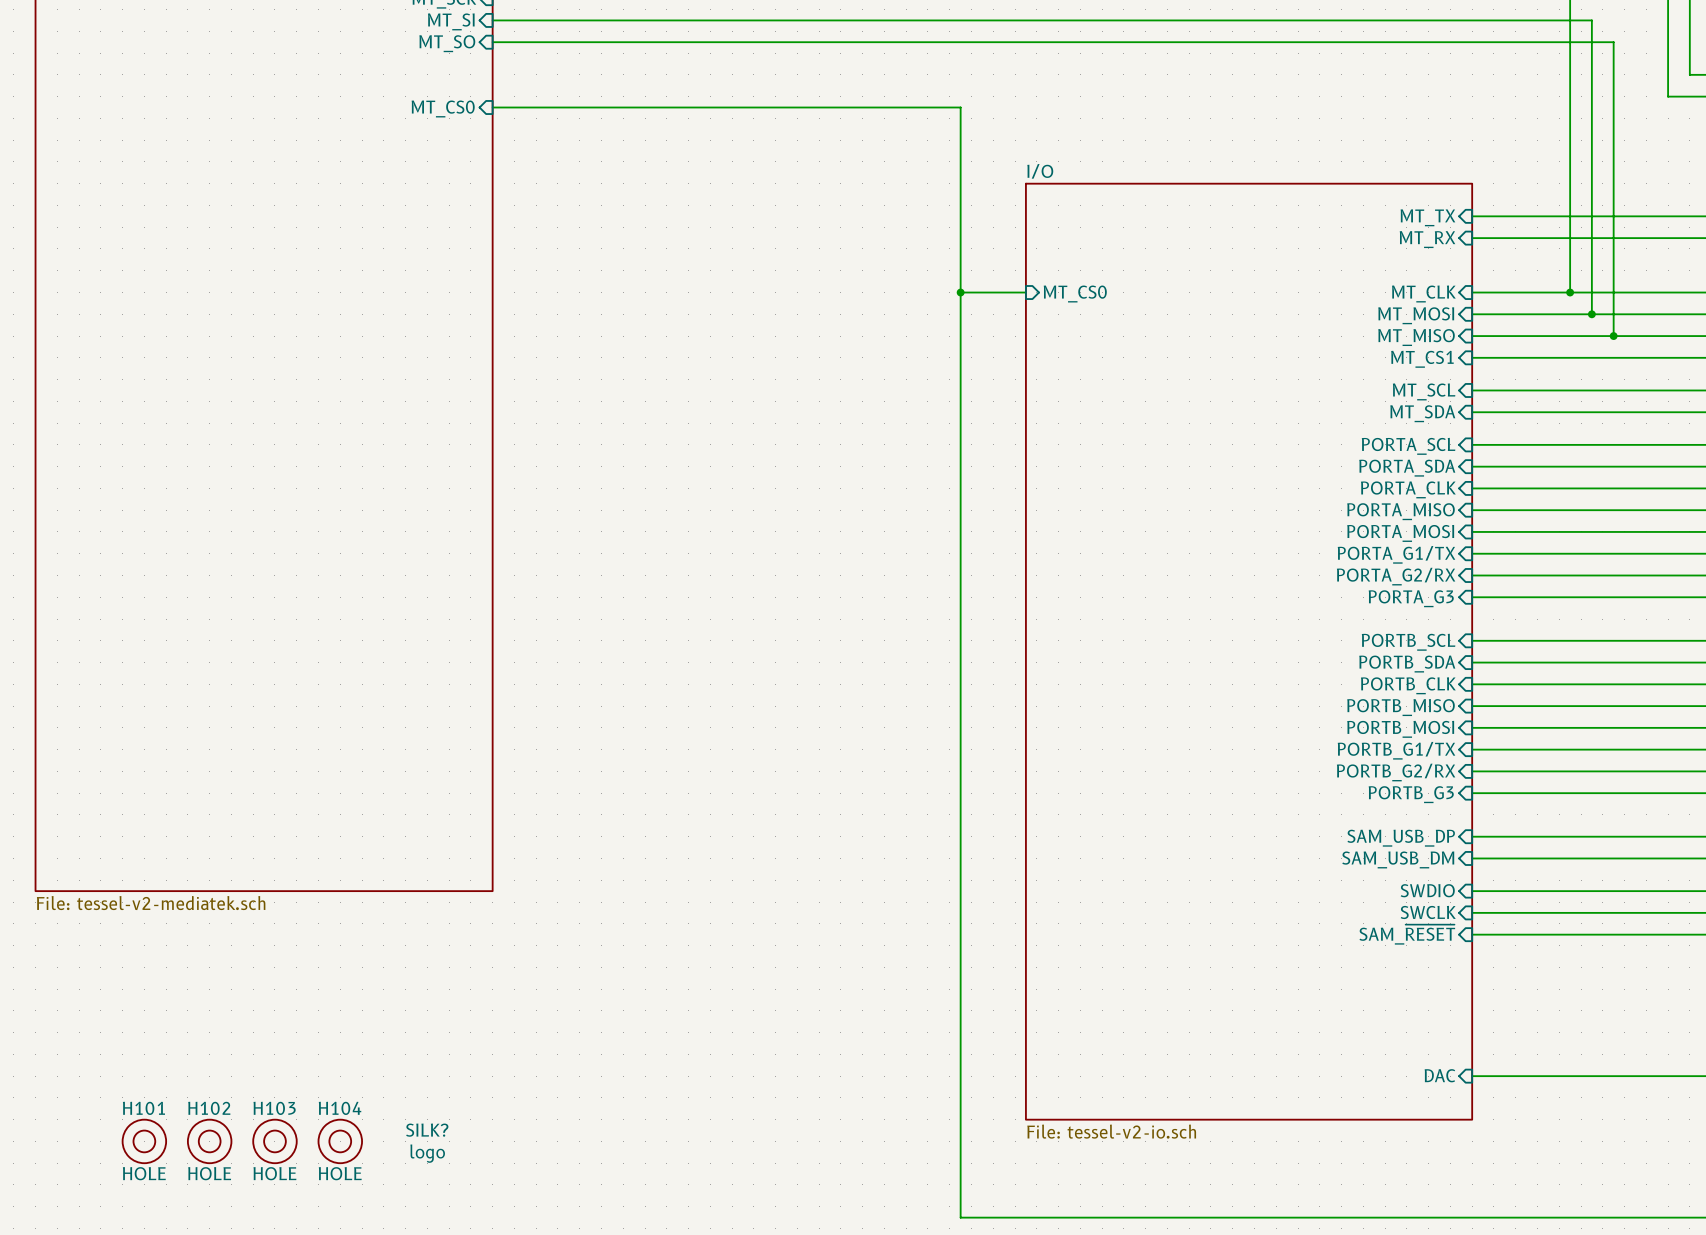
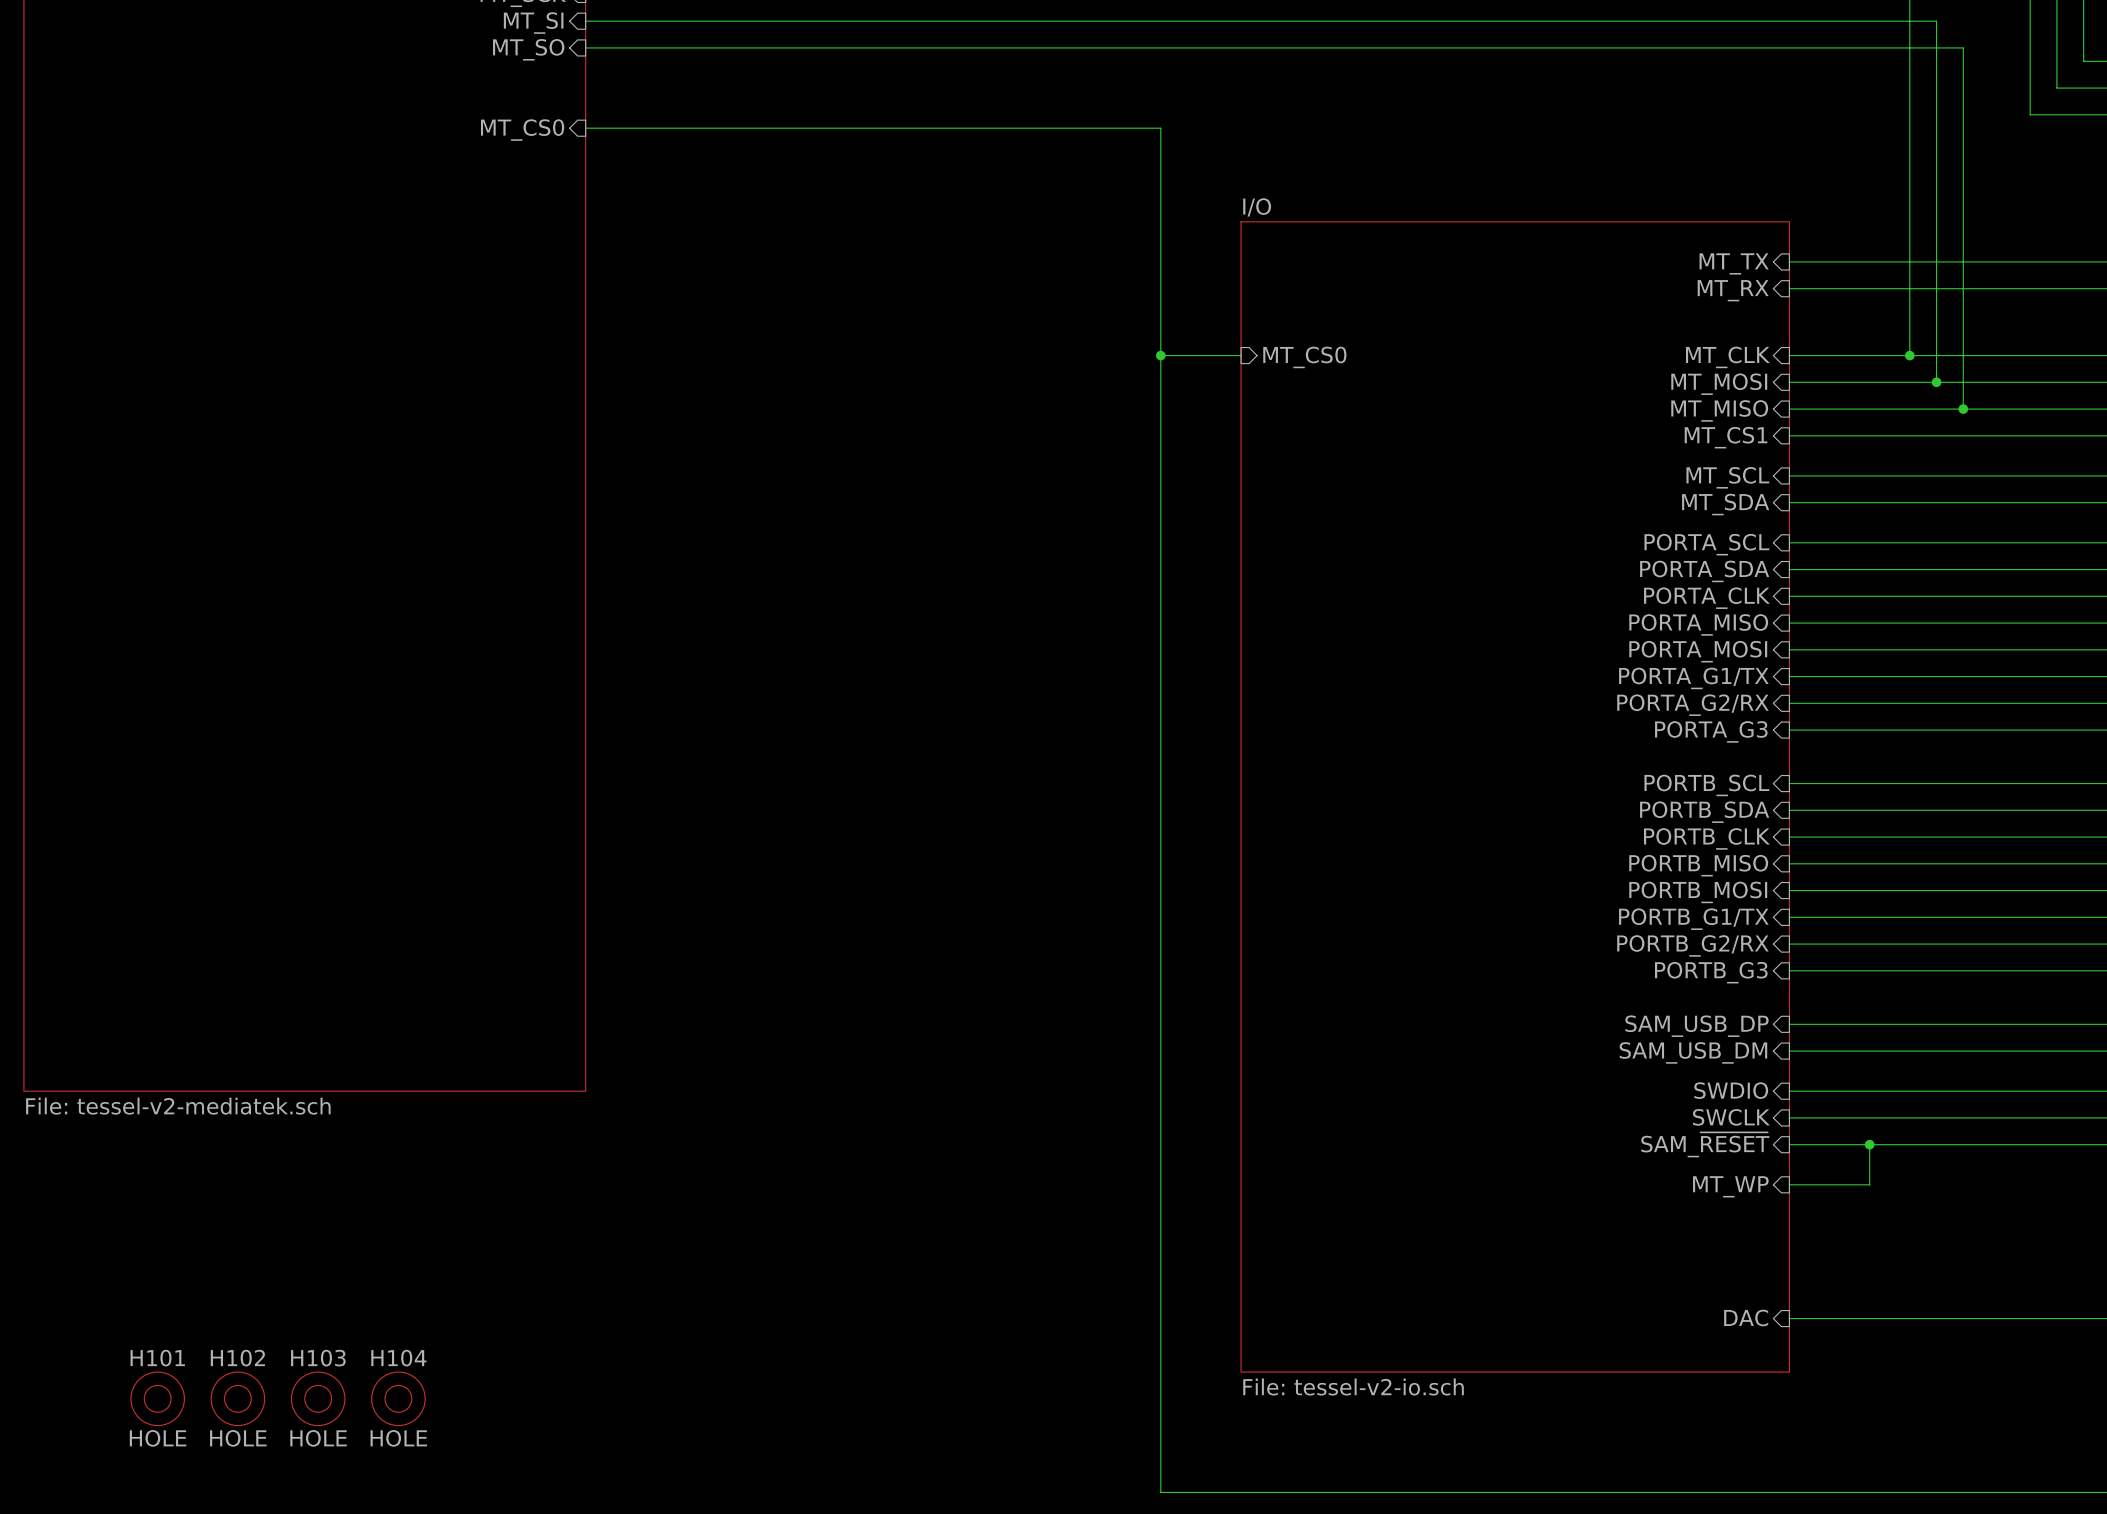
wire: none -> (1869, 1144) (1869, 1184) (1789, 1184)
junction: none -> (1869, 1144)
sheet pin: none -> MT_WP (1730, 1186)
SILK?: logo (427, 1143) -> none

